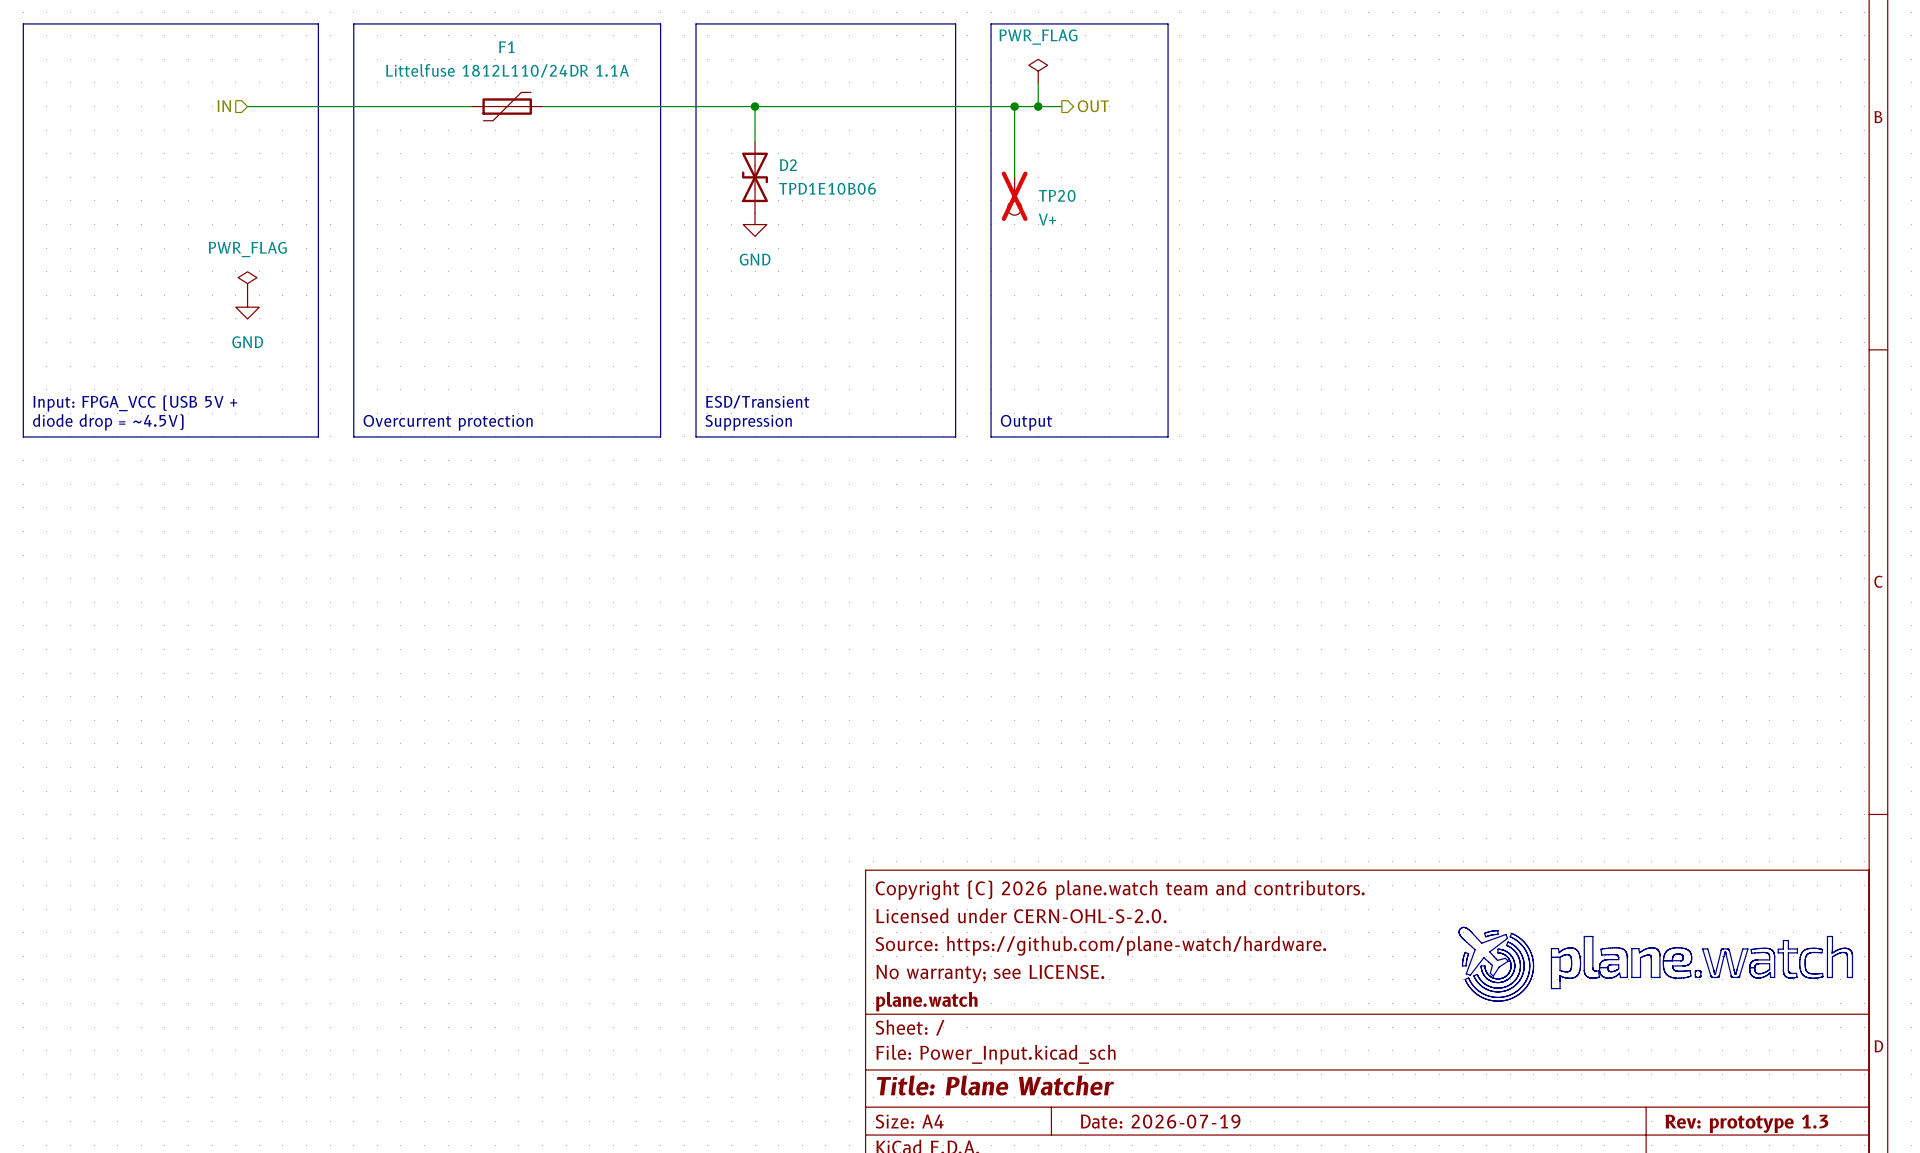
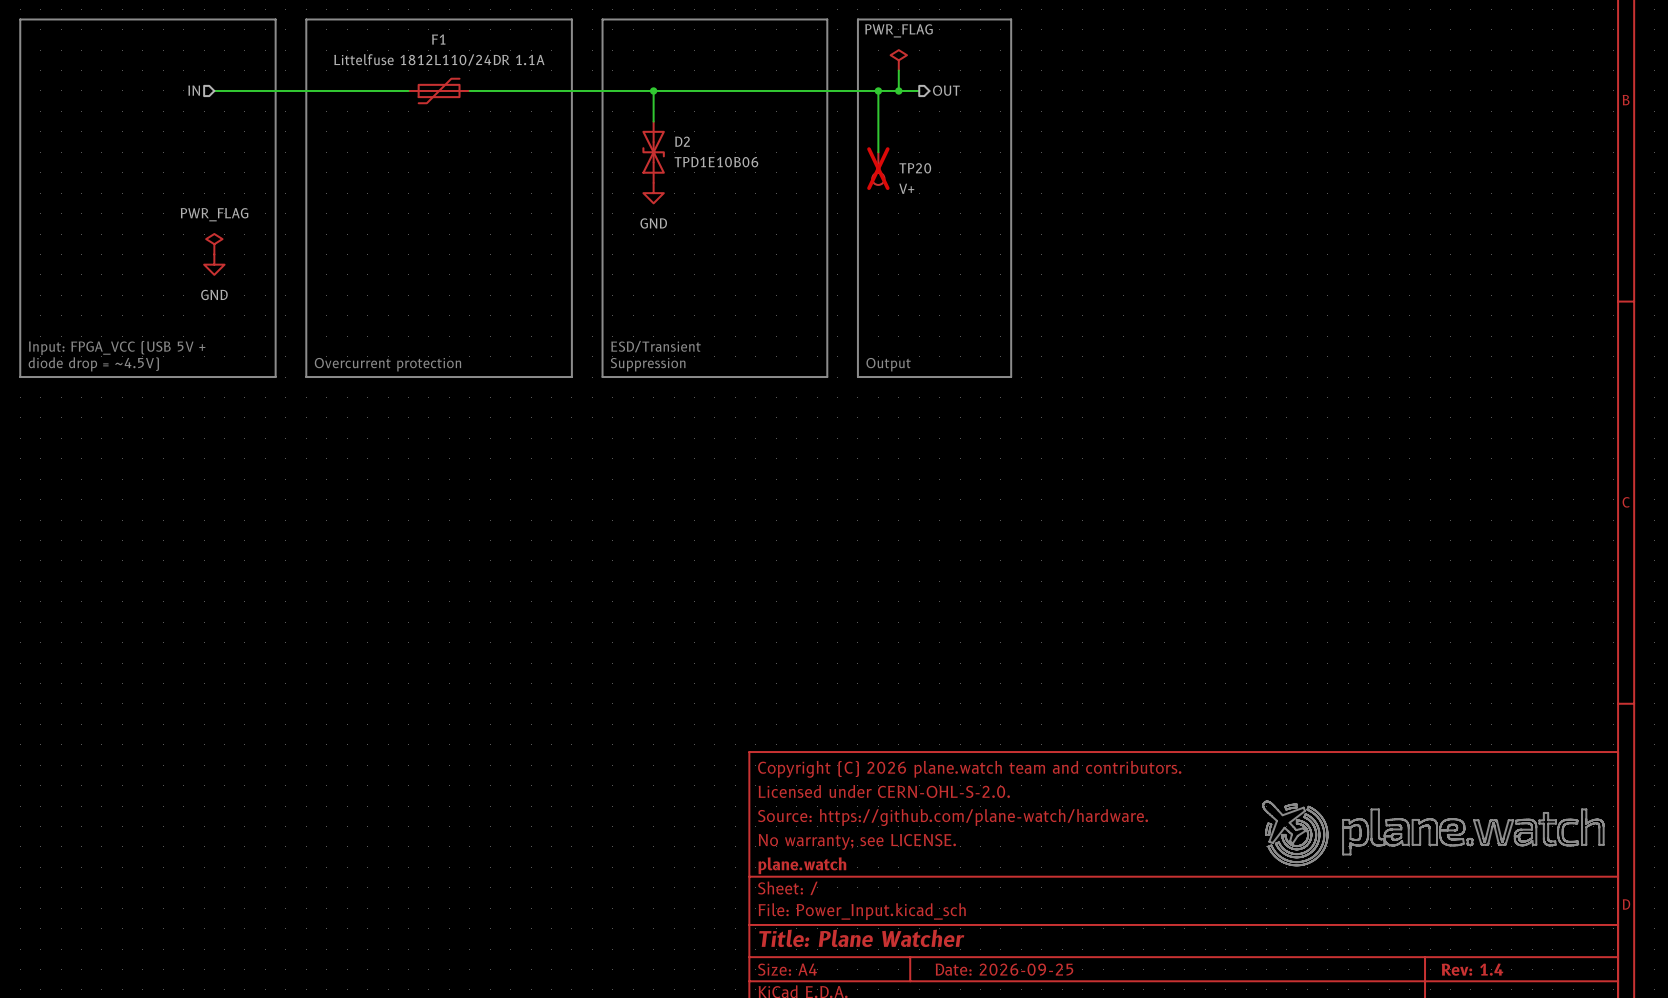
title block: Date: 2026-07-19 (1160, 1121) -> Date: 2026-09-25 (1004, 969)
title block: Rev: prototype 1.3 (1746, 1123) -> Rev: 1.4 (1472, 969)

